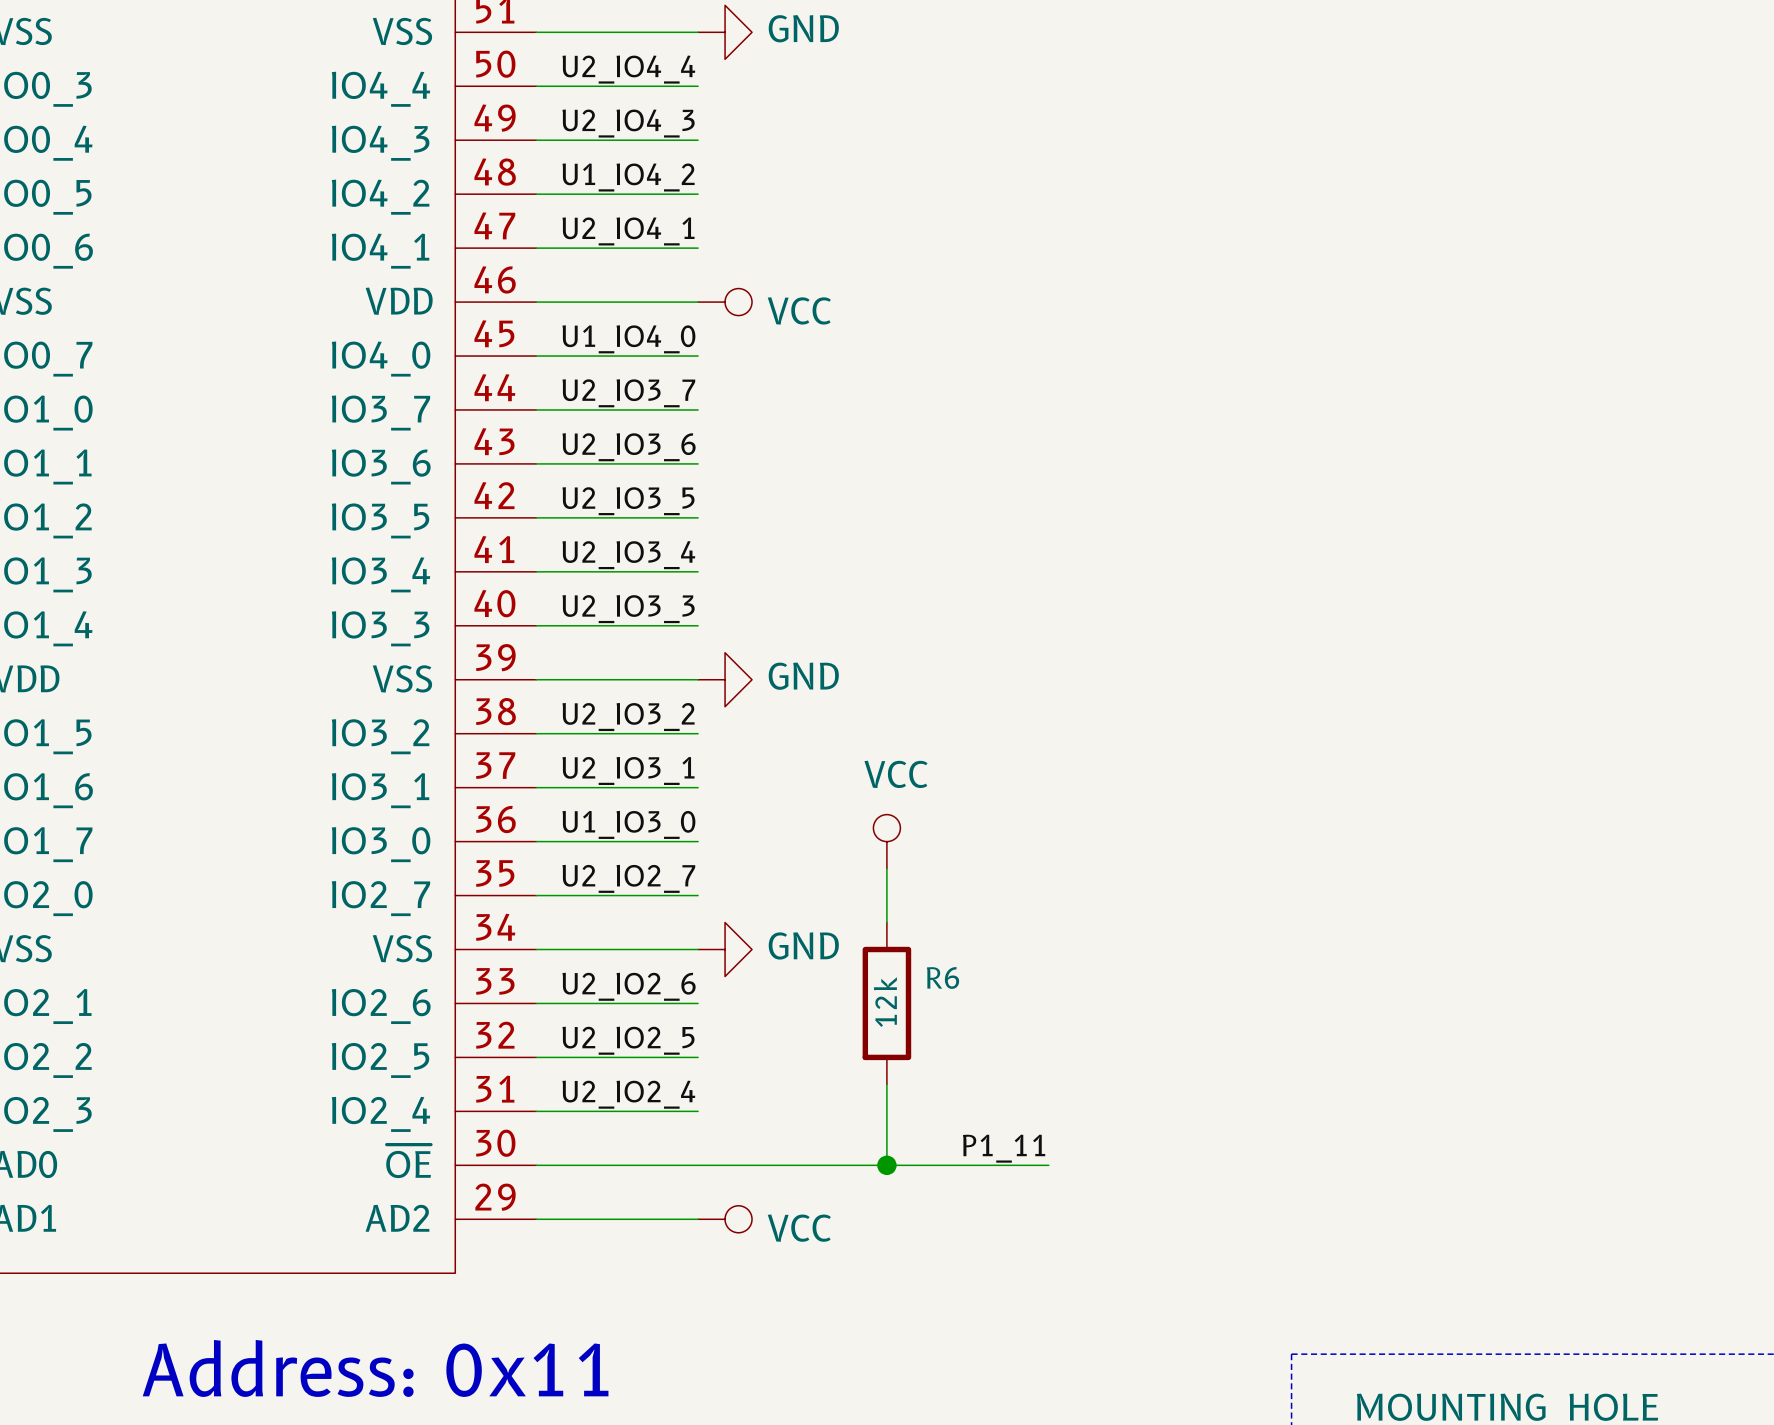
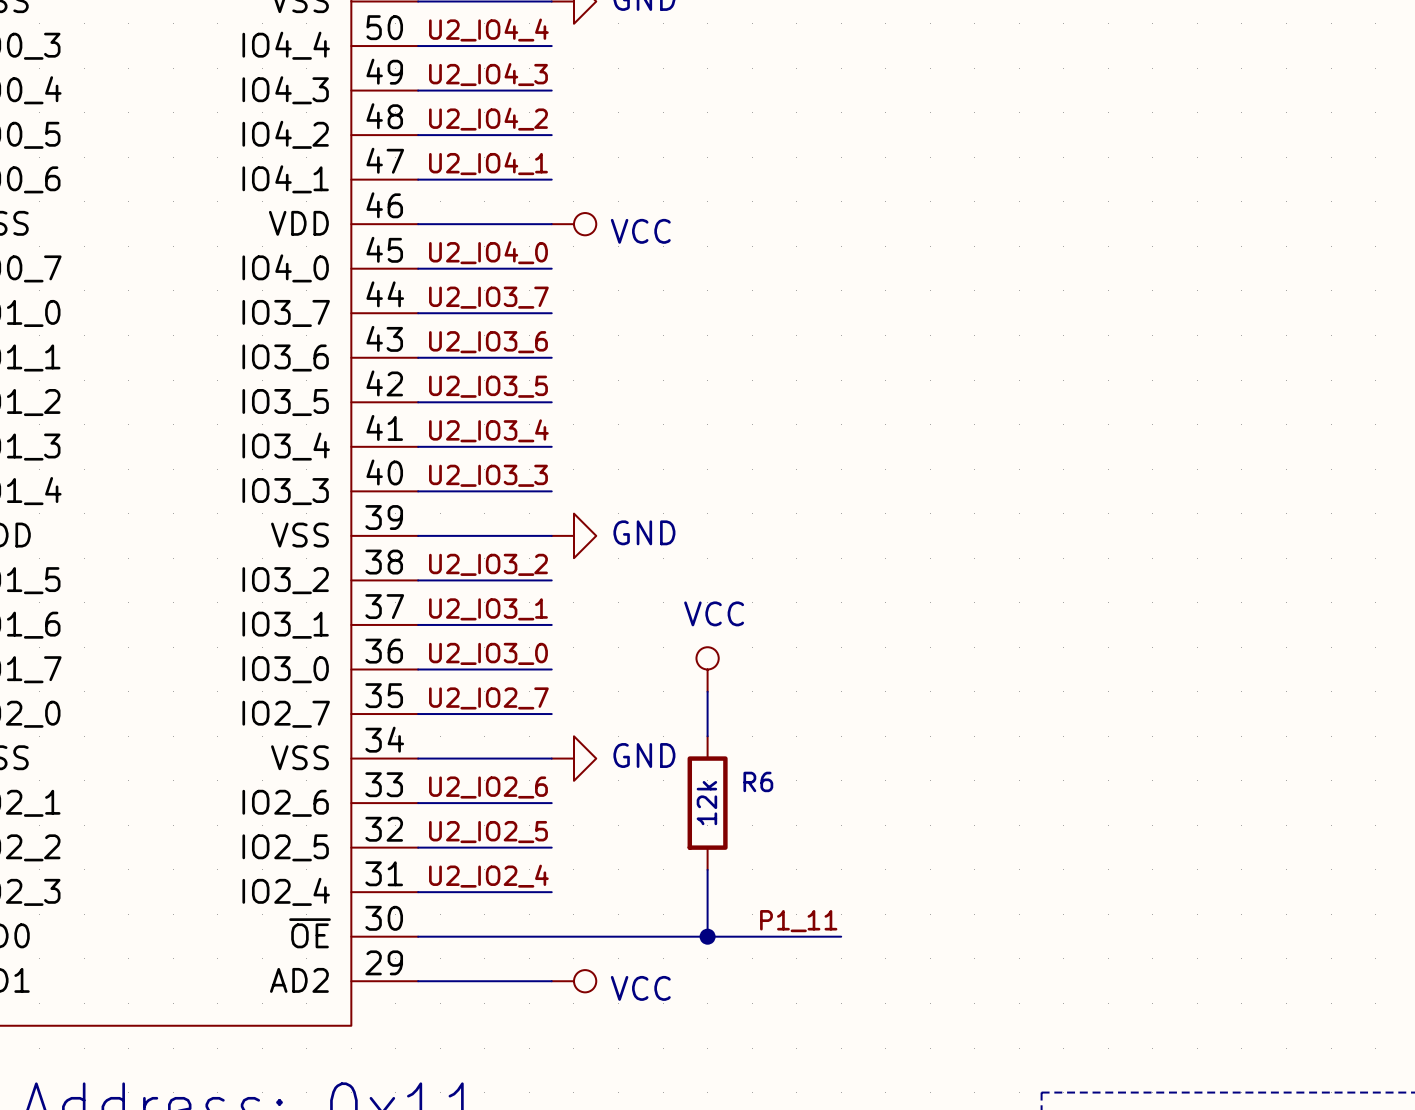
label: U1_IO4_2 (628, 177) -> U2_IO4_2 (488, 119)
label: U1_IO4_0 (628, 339) -> U2_IO4_0 (488, 252)
label: U1_IO3_0 (628, 824) -> U2_IO3_0 (488, 653)

